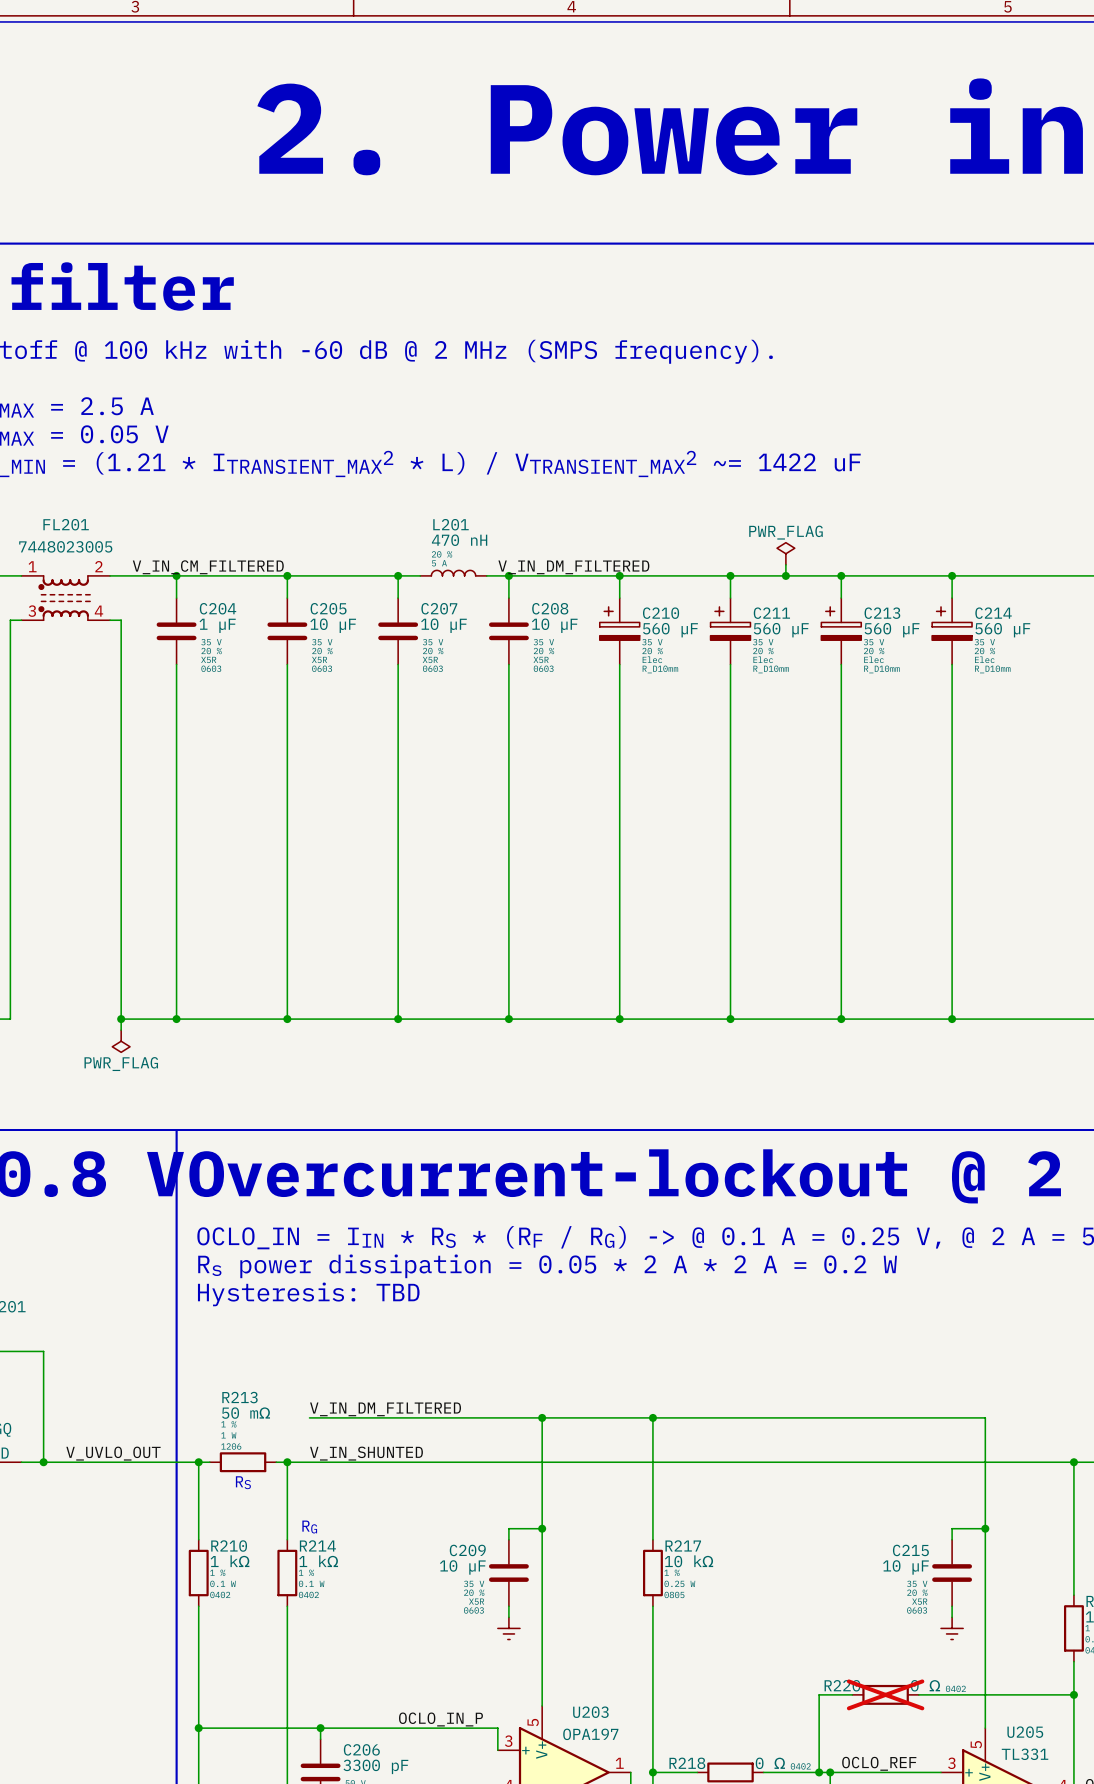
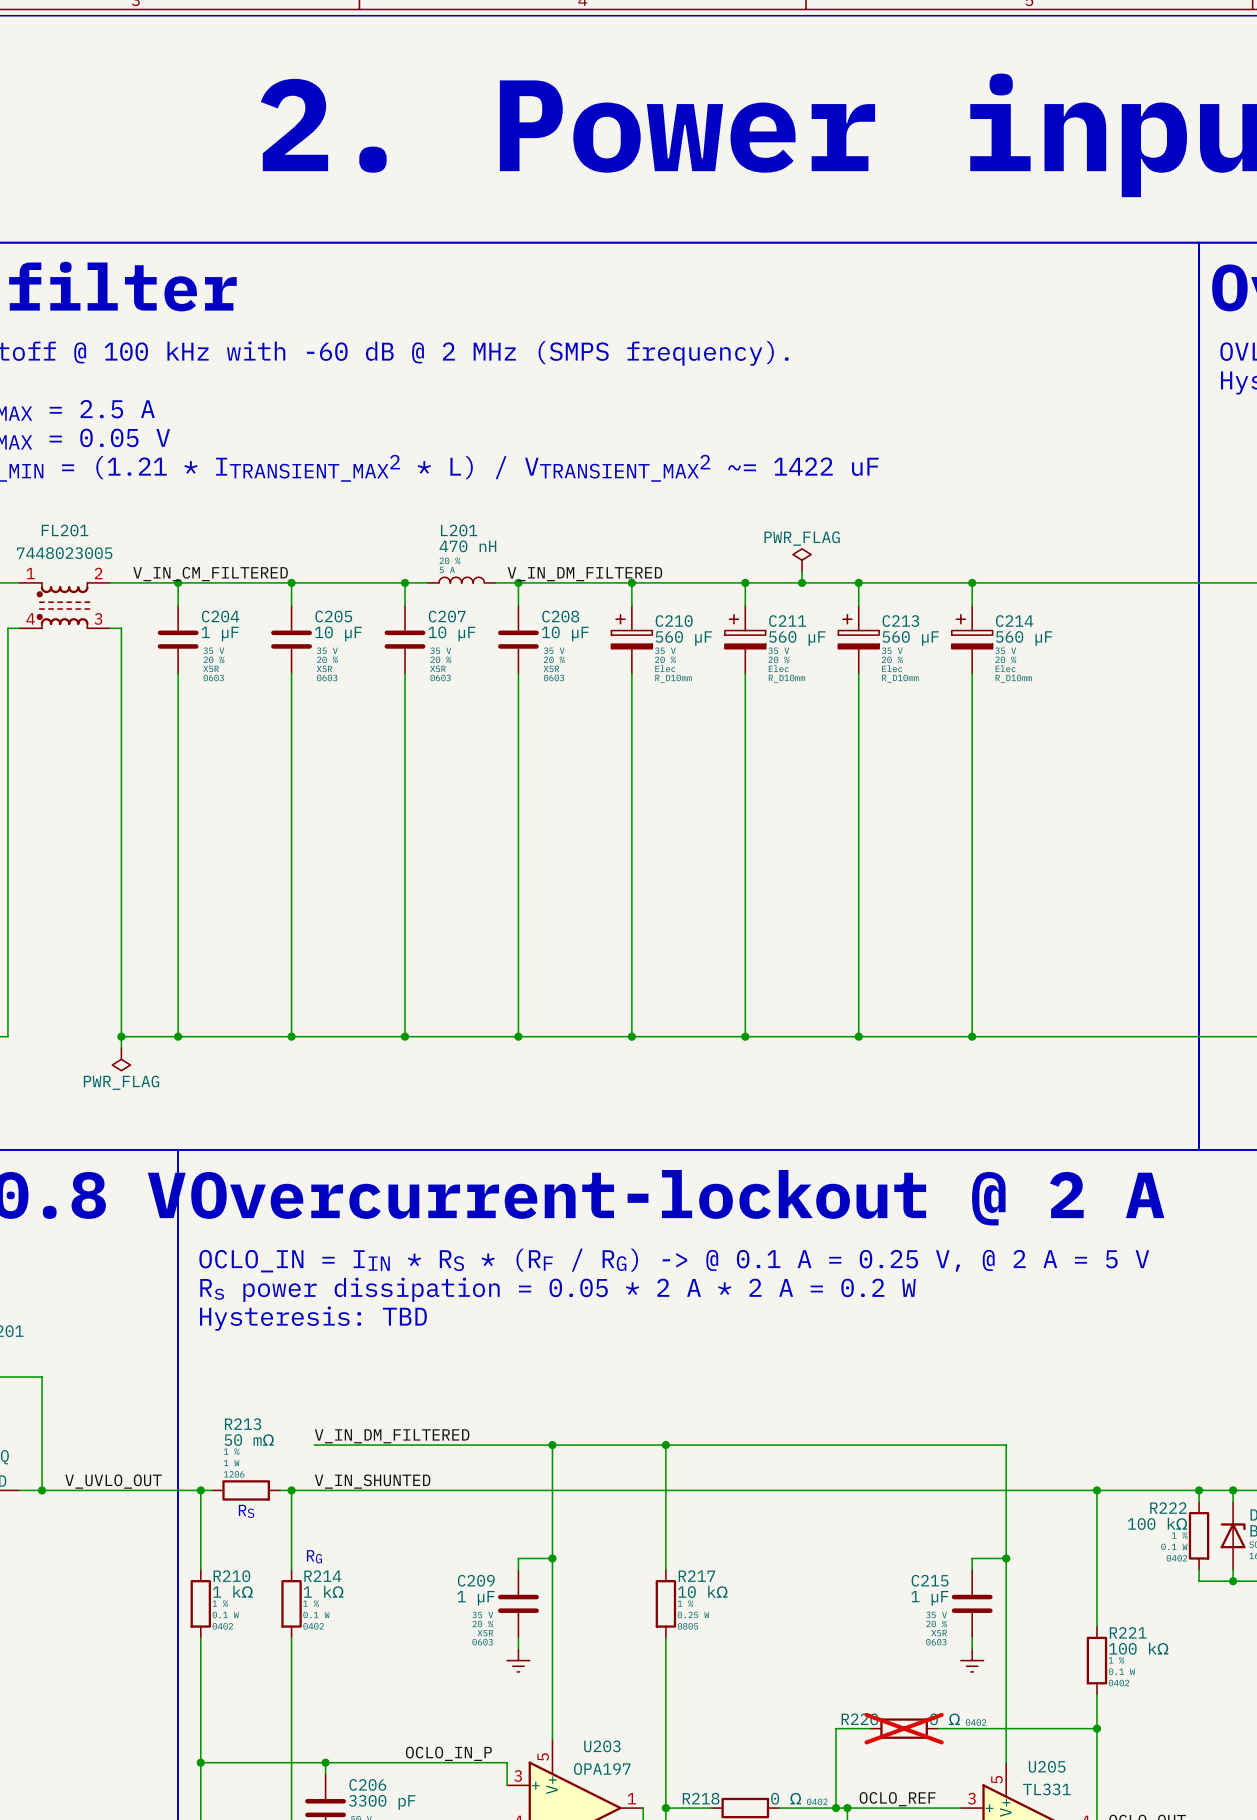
FL201 pin number: 3 (32, 611) -> 4 (30, 618)
FL201 pin number: 4 (98, 611) -> 3 (98, 618)
C209 value: 10 µF (462, 1567) -> 1 µF (476, 1598)
C215 value: 10 µF (905, 1567) -> 1 µF (929, 1598)

